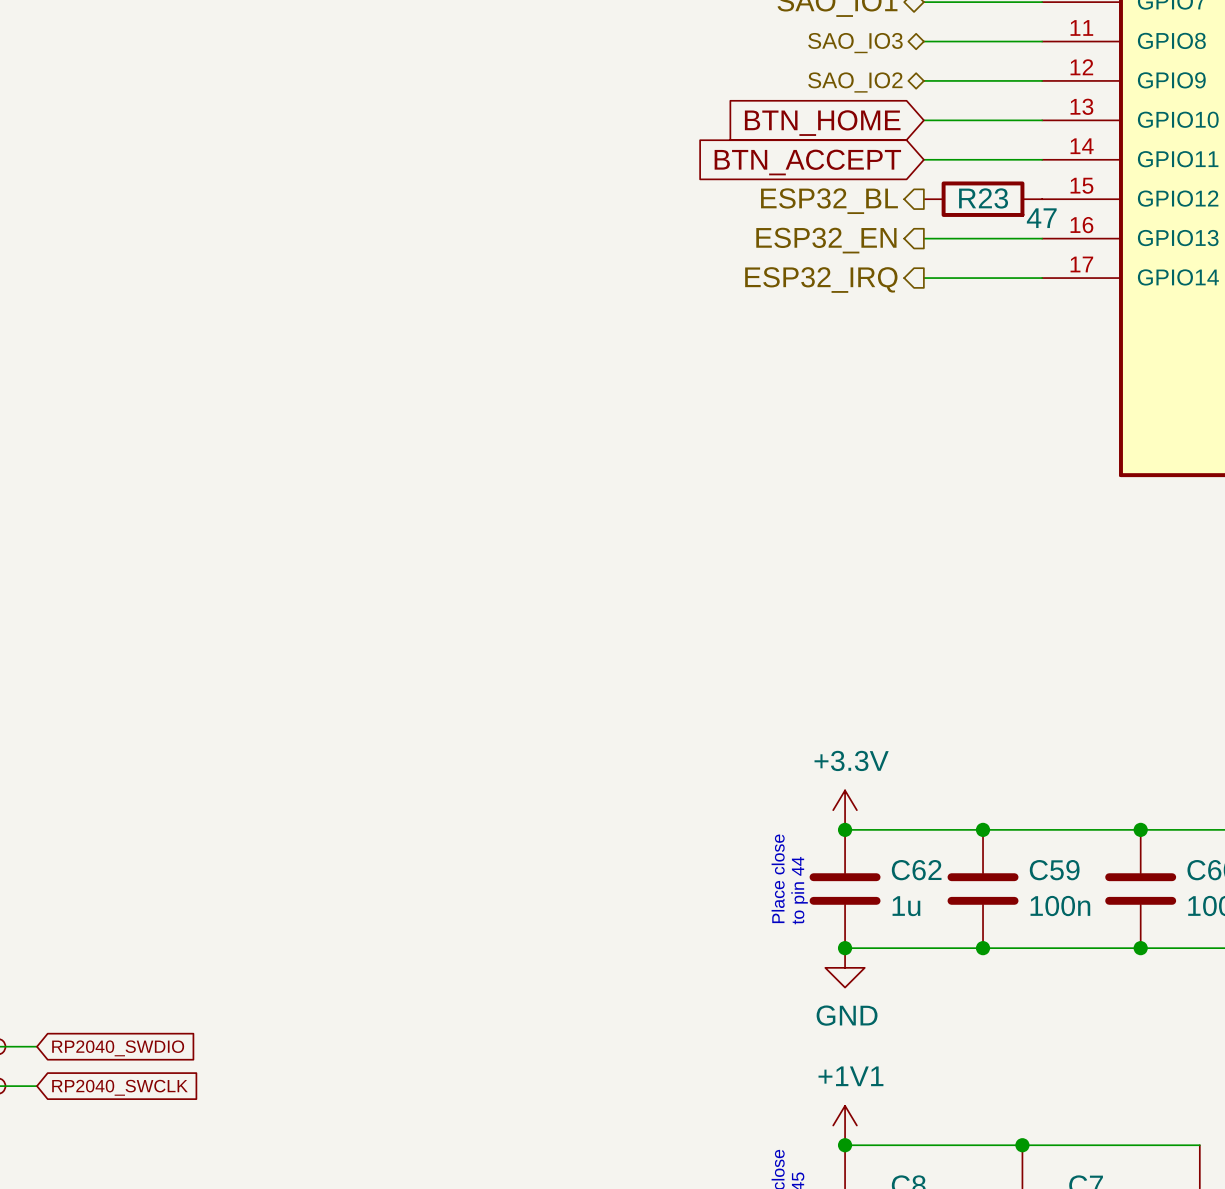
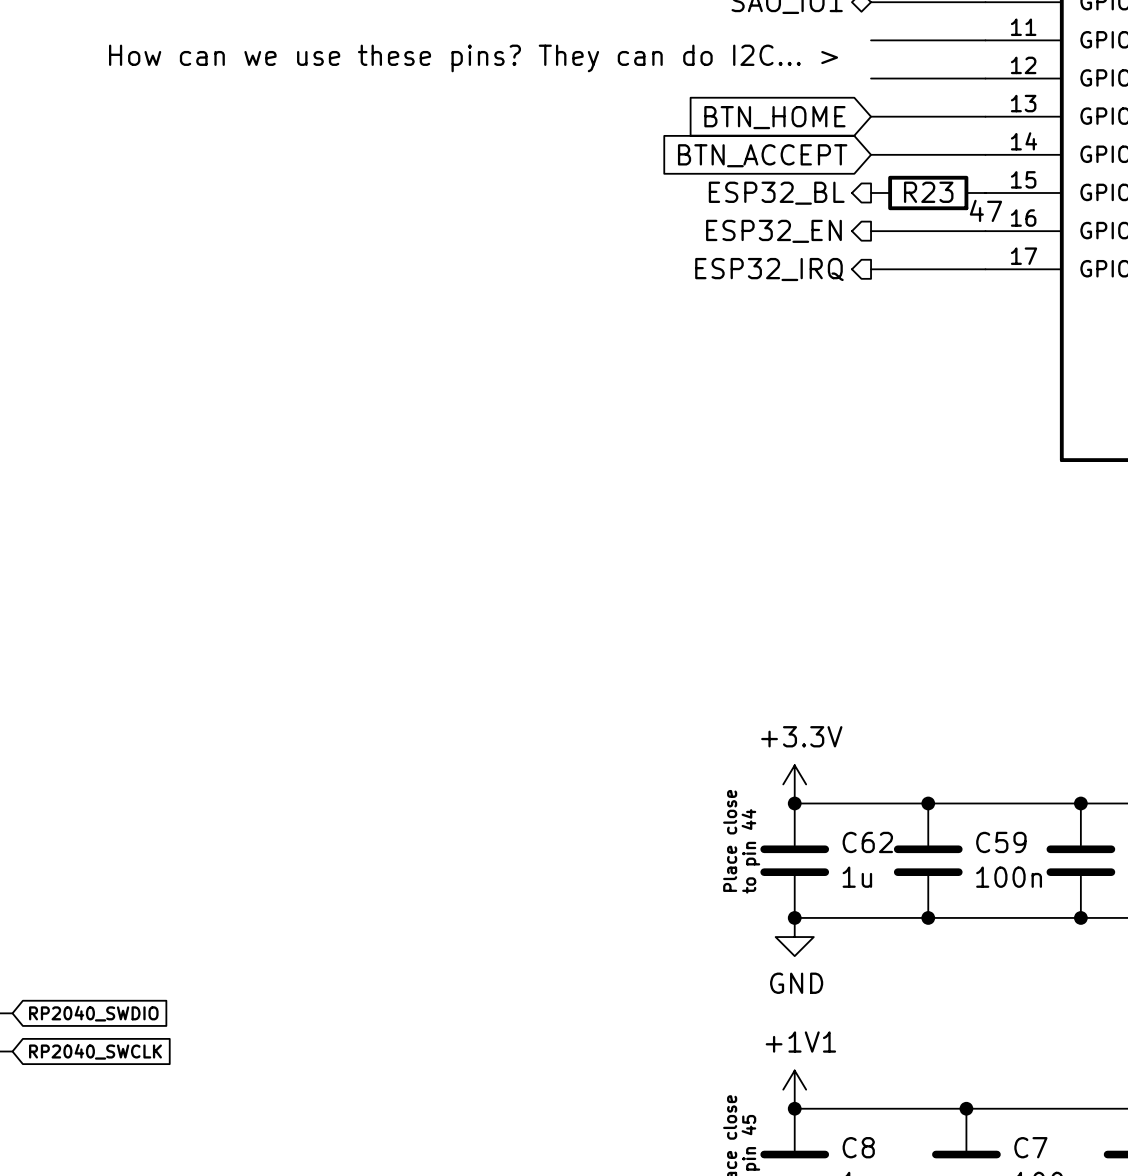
hierarchical label: SAO_IO3 (855, 43) -> none
text: none -> How can we use these pins? They can do I2C... > (473, 58)
hierarchical label: SAO_IO2 (855, 82) -> none

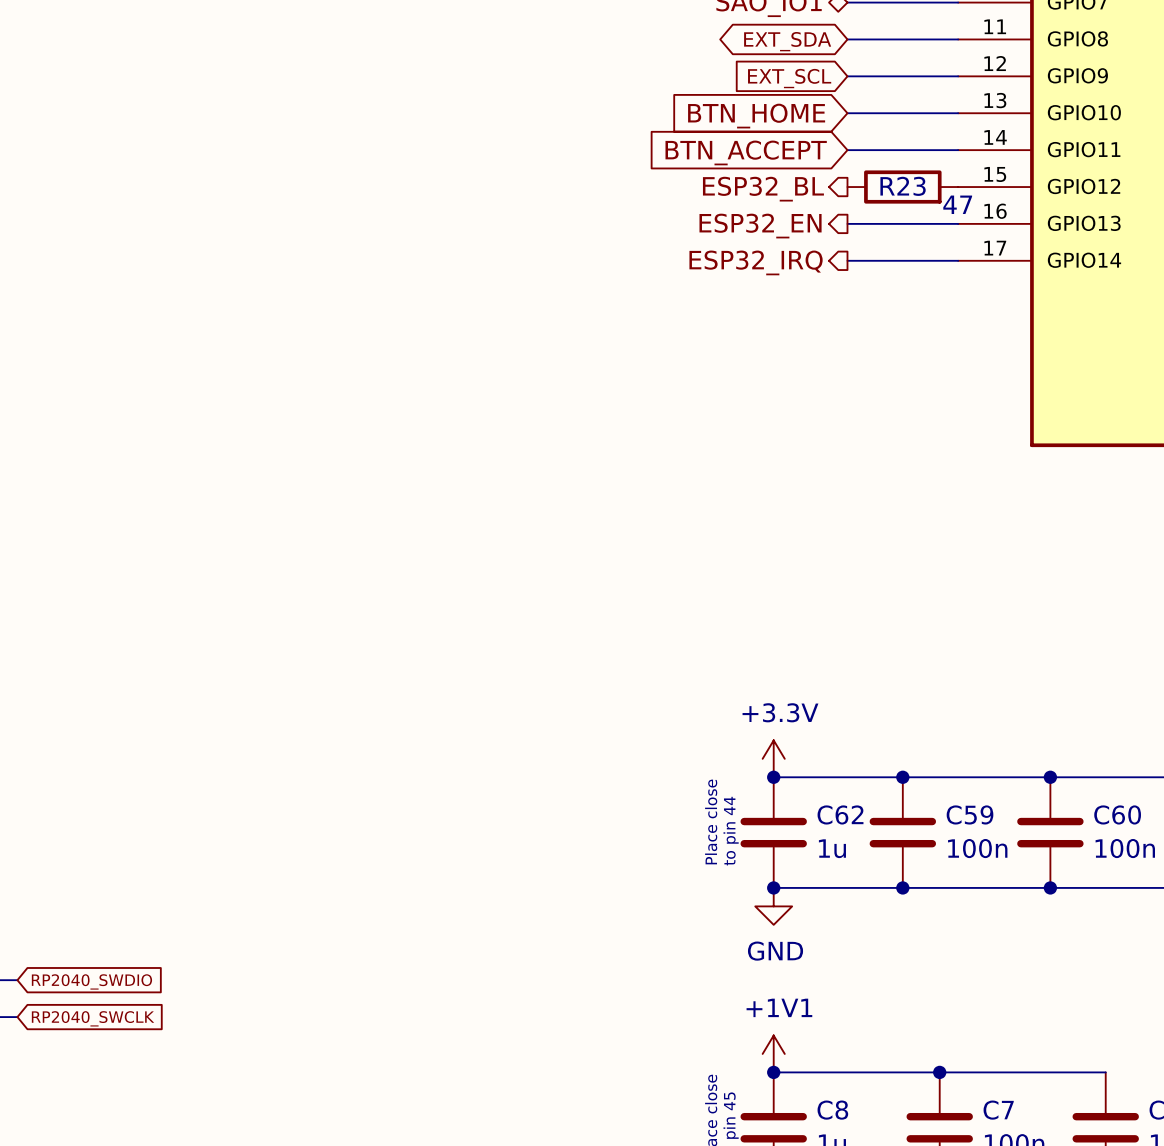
global label: none -> EXT_SDA (787, 41)
text: How can we use these pins? They can do I2C... > (473, 58) -> none
global label: none -> EXT_SCL (789, 78)

